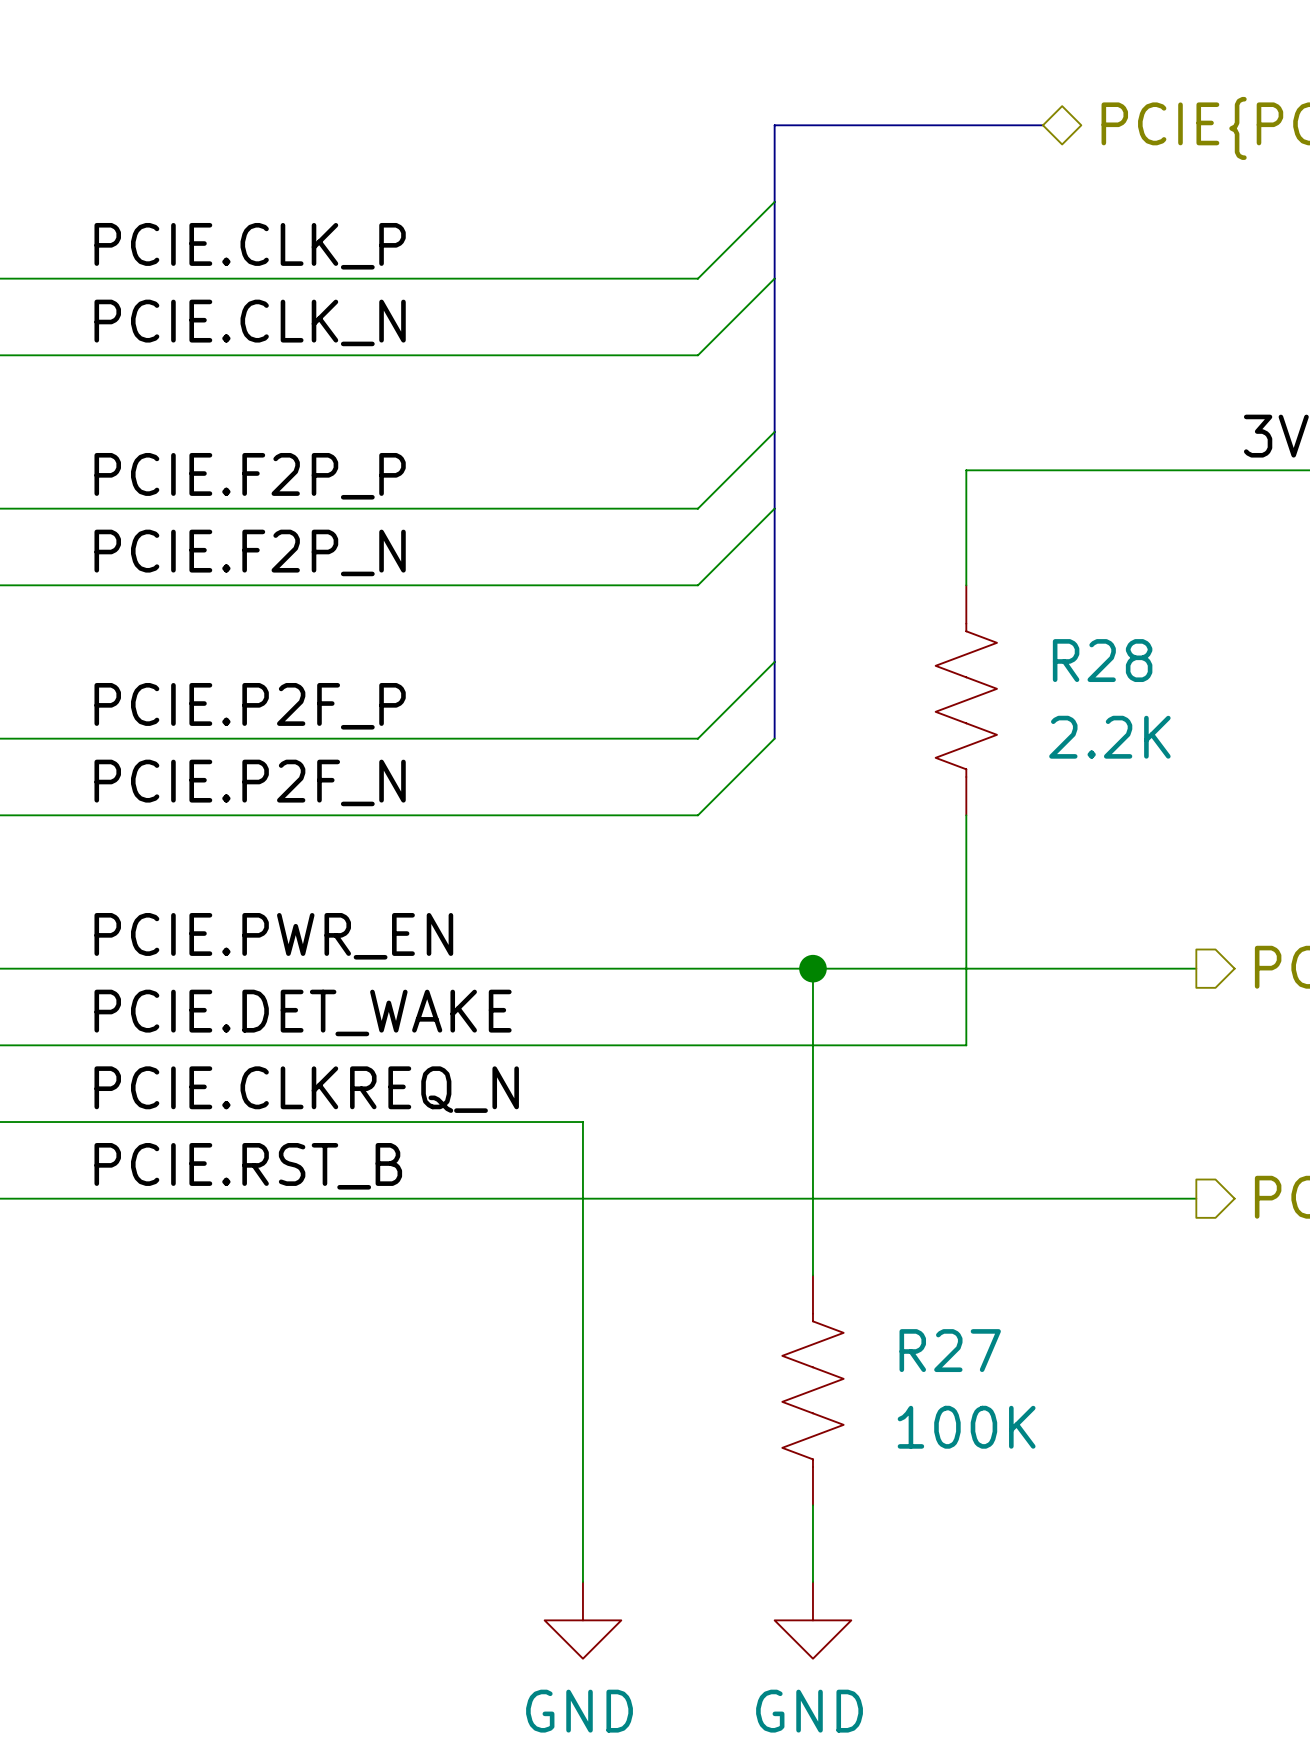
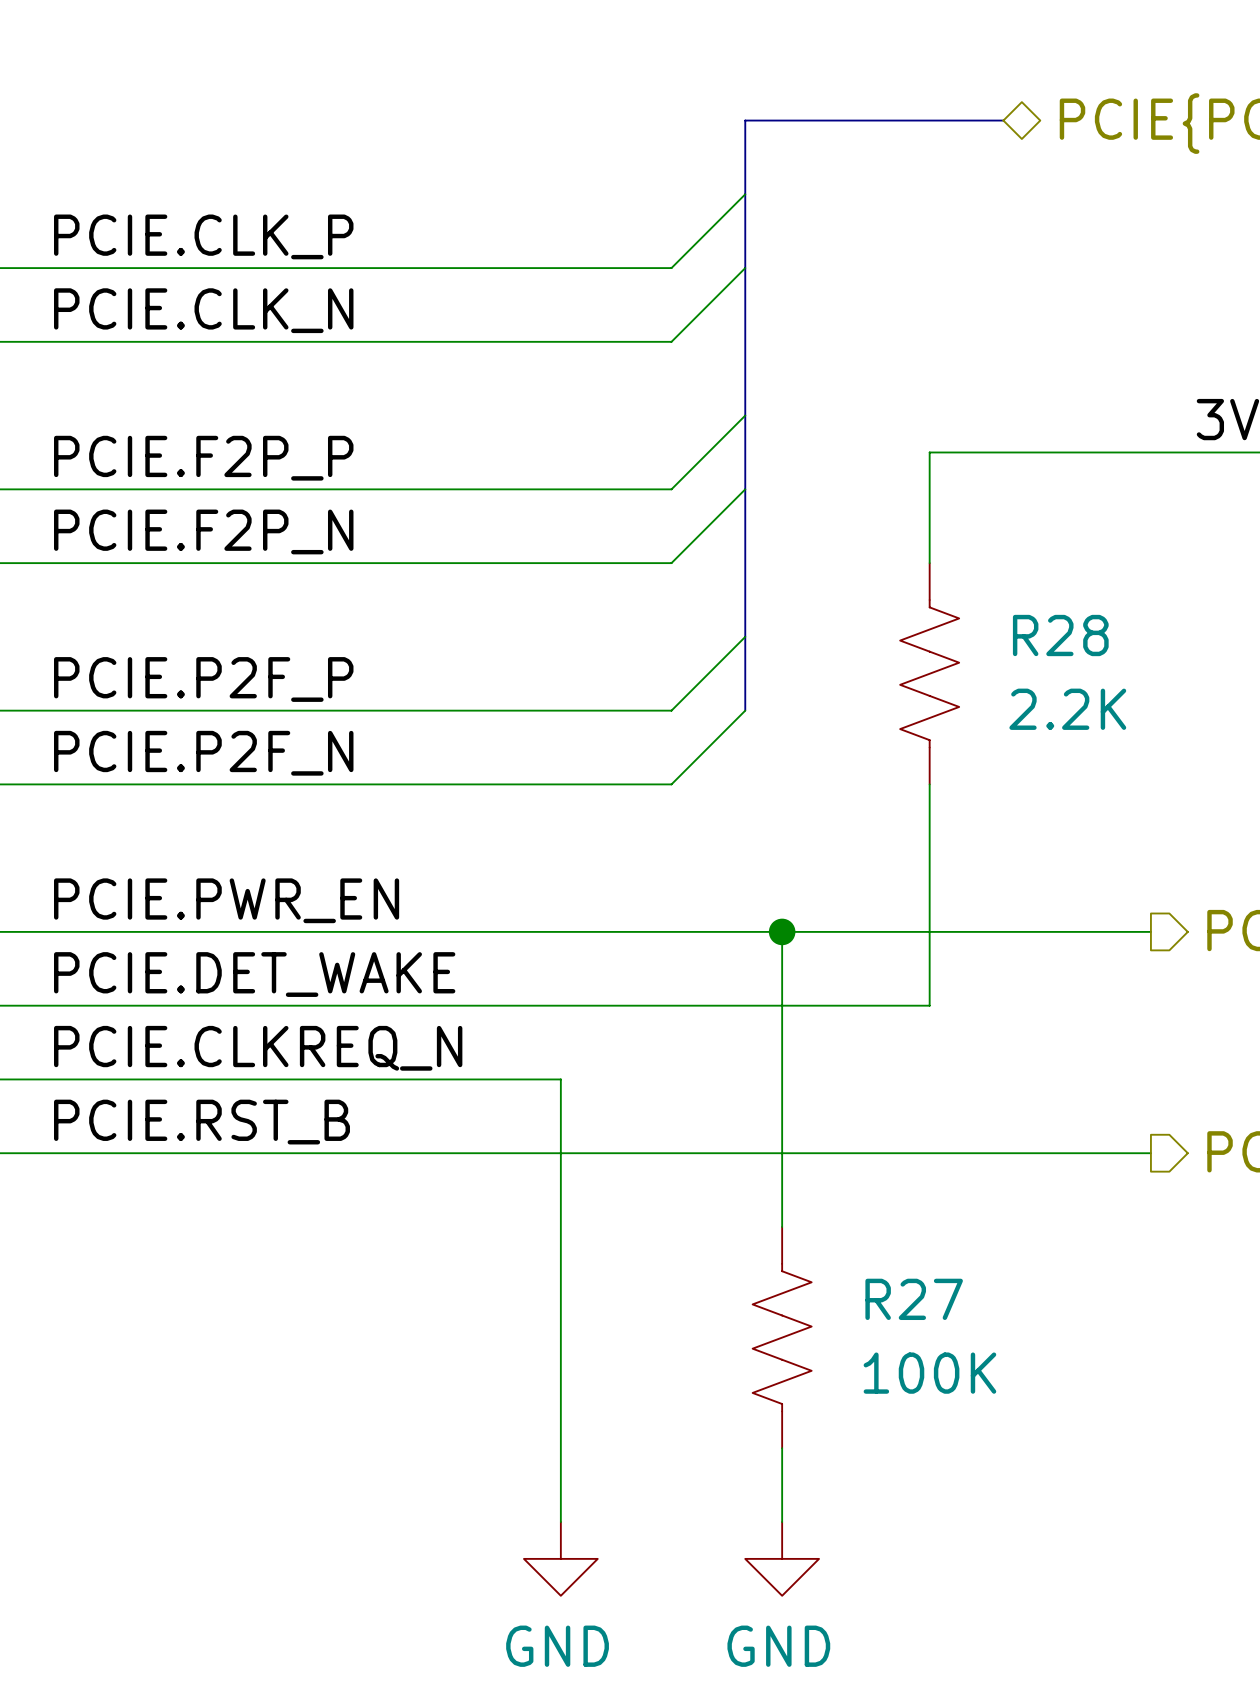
label position: PCIE.CLK_P (250, 246) -> PCIE.CLK_P (203, 236)
label position: PCIE.CLK_N (250, 322) -> PCIE.CLK_N (203, 310)
label position: PCIE.F2P_P (250, 476) -> PCIE.F2P_P (203, 458)
label position: PCIE.F2P_N (250, 552) -> PCIE.F2P_N (203, 531)
label position: PCIE.P2F_P (250, 706) -> PCIE.P2F_P (203, 679)
label position: PCIE.P2F_N (250, 782) -> PCIE.P2F_N (203, 753)
label position: PCIE.PWR_EN (273, 936) -> PCIE.PWR_EN (226, 900)
label position: PCIE.DET_WAKE (303, 1012) -> PCIE.DET_WAKE (254, 974)
label position: PCIE.CLKREQ_N (306, 1089) -> PCIE.CLKREQ_N (258, 1048)
label position: PCIE.RST_B (248, 1166) -> PCIE.RST_B (201, 1122)

